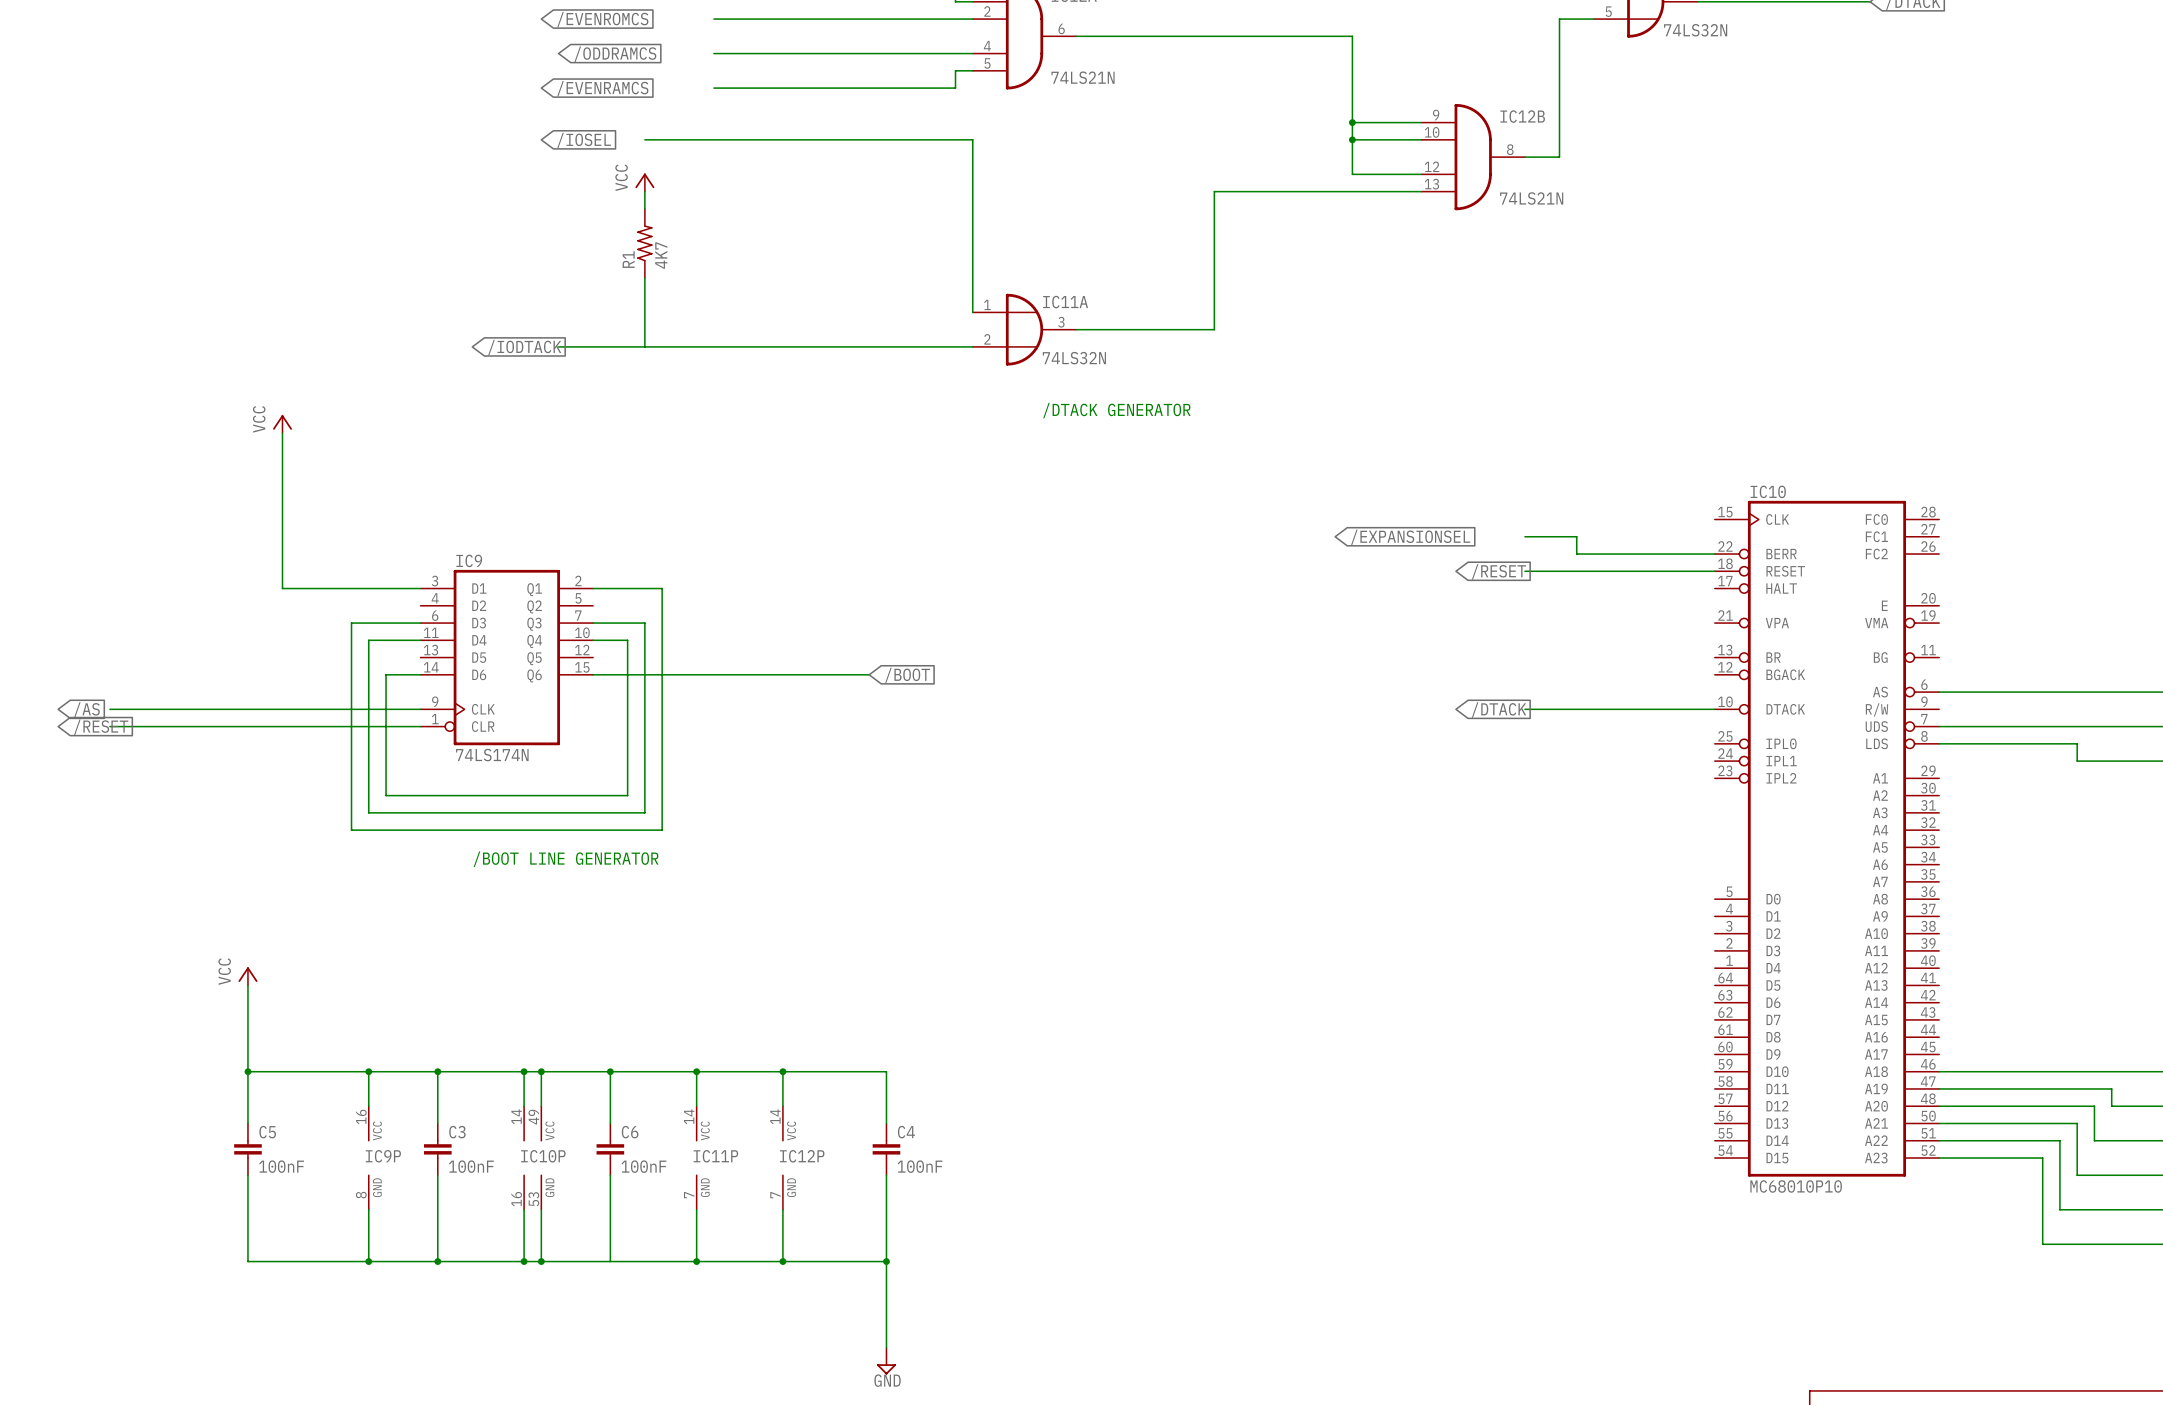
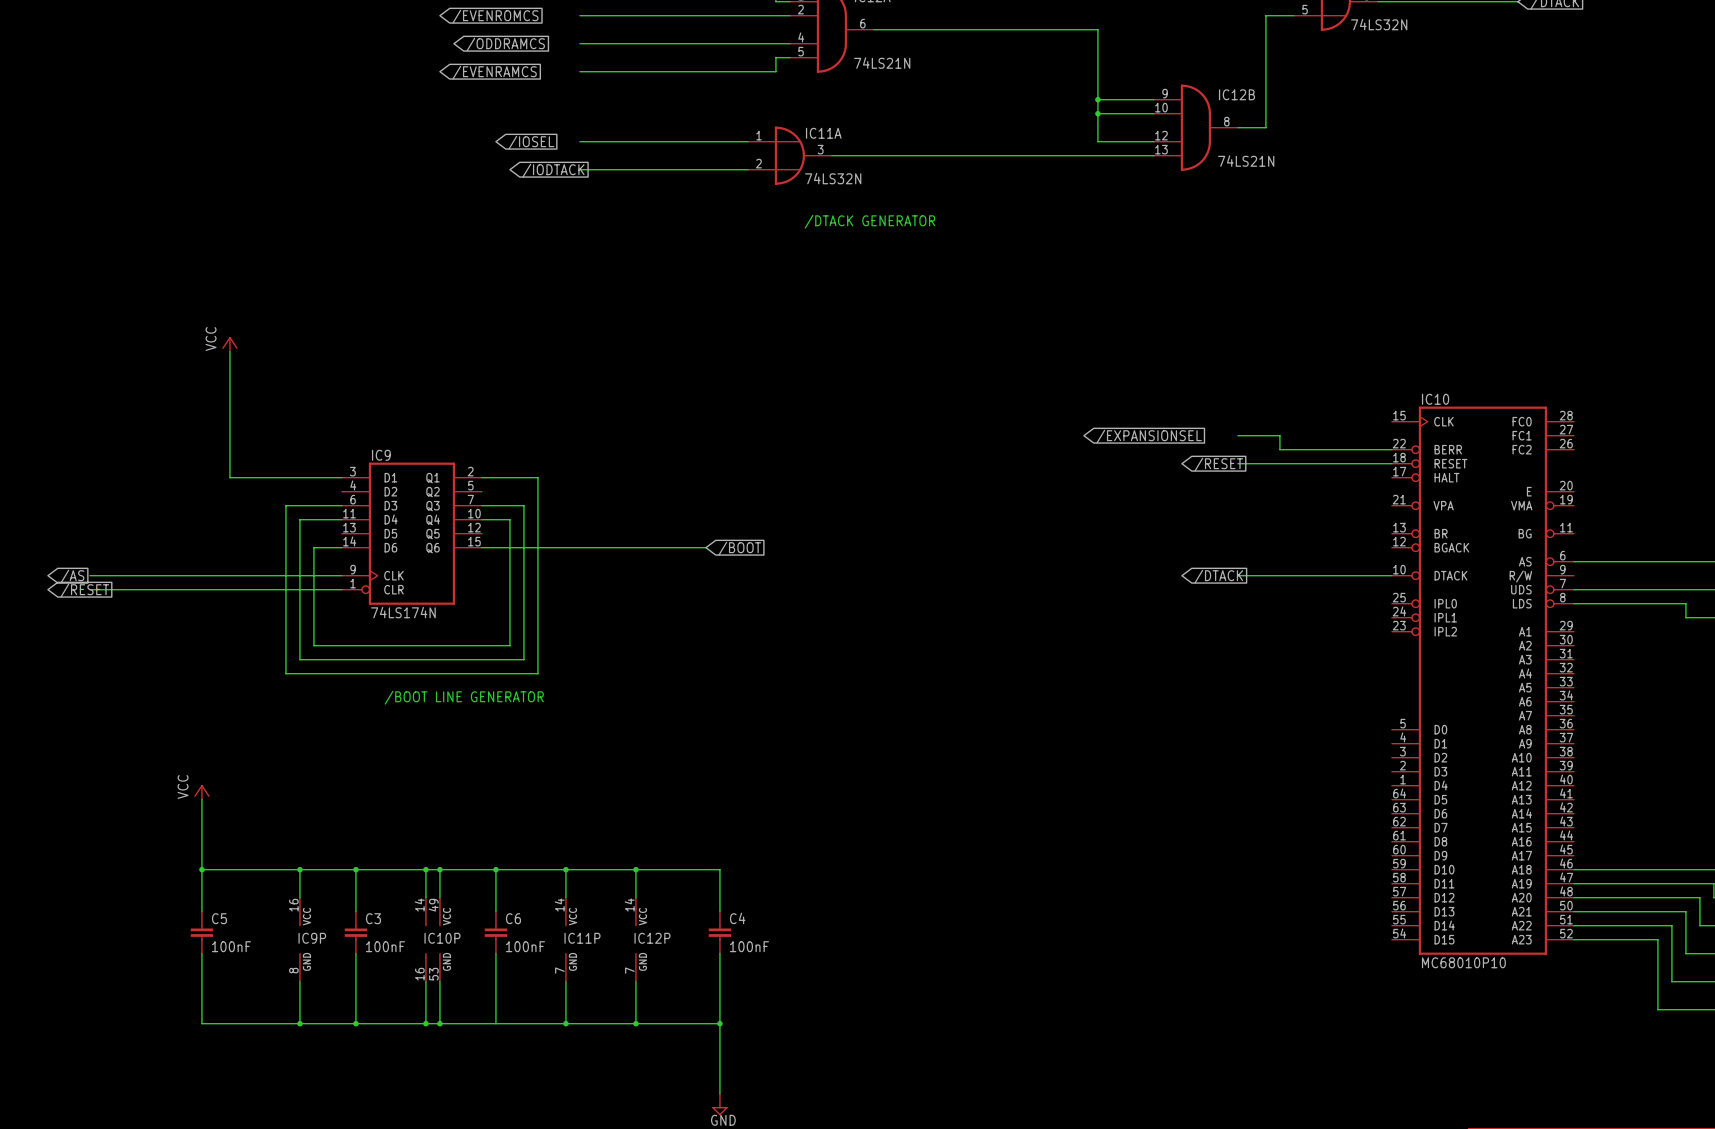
wire: (644, 139) (972, 139) (972, 312) -> none
global label position: /IOSEL (584, 140) -> /IOSEL (531, 142)
wire: none -> (579, 141) (747, 141)
power symbol: VCC (644, 182) -> none
wire: (644, 191) (644, 208) -> none
wire: (1214, 191) (1214, 329) (1076, 329) -> (985, 155) (831, 155)
wire: none -> (579, 169) (747, 169)
global label: none -> /IODTACK (553, 170)
R1: 4K7 (644, 243) -> none
wire: (644, 277) (644, 346) -> none
IC11A position: (1024, 329) -> (789, 155)
wire: (558, 346) (972, 346) -> none
global label: /IODTACK (524, 347) -> none
text position: /DTACK GENERATOR (1116, 410) -> /DTACK GENERATOR (869, 221)

